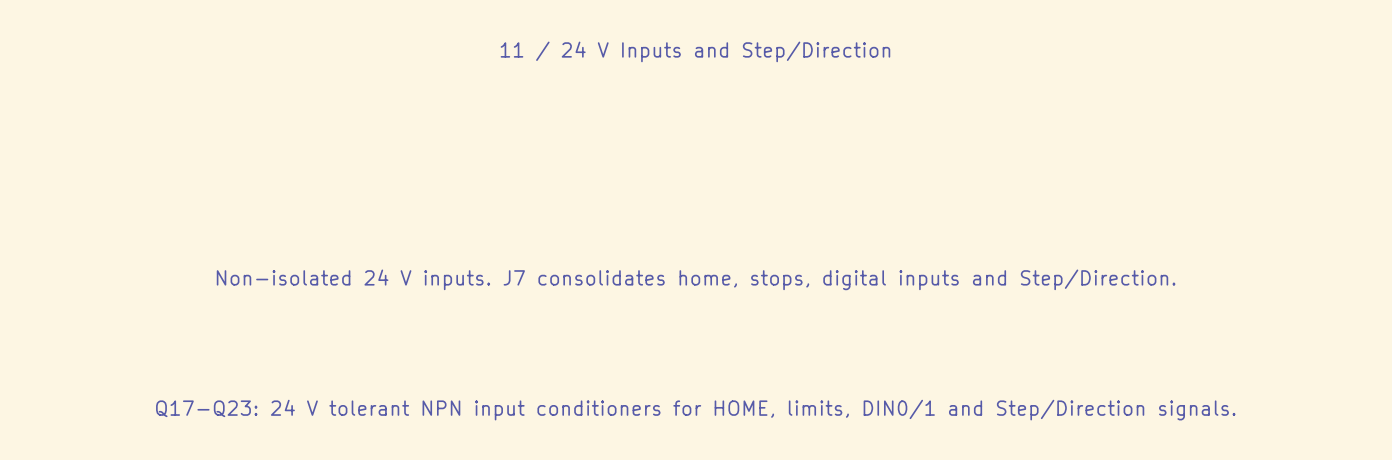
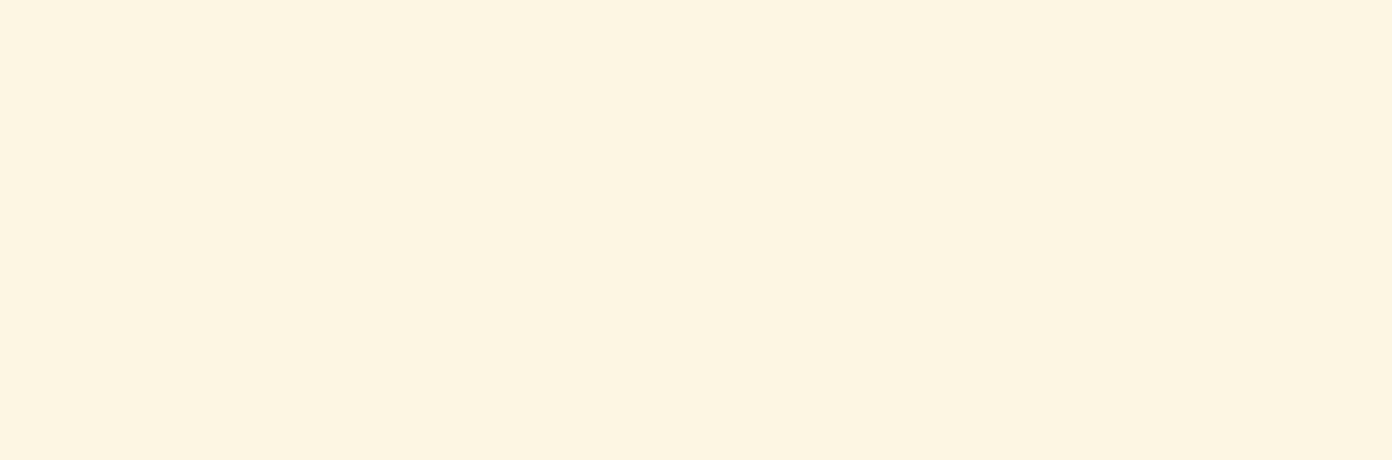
text: 11 / 24 V Inputs and Step/Direction (695, 51) -> none
text: Non-isolated 24 V inputs. J7 consolidates home, stops, digital inputs and Step/Direction. (696, 279) -> none
text: Q17-Q23: 24 V tolerant NPN input conditioners for HOME, limits, DIN0/1 and Step/Direction signals. (695, 410) -> none

